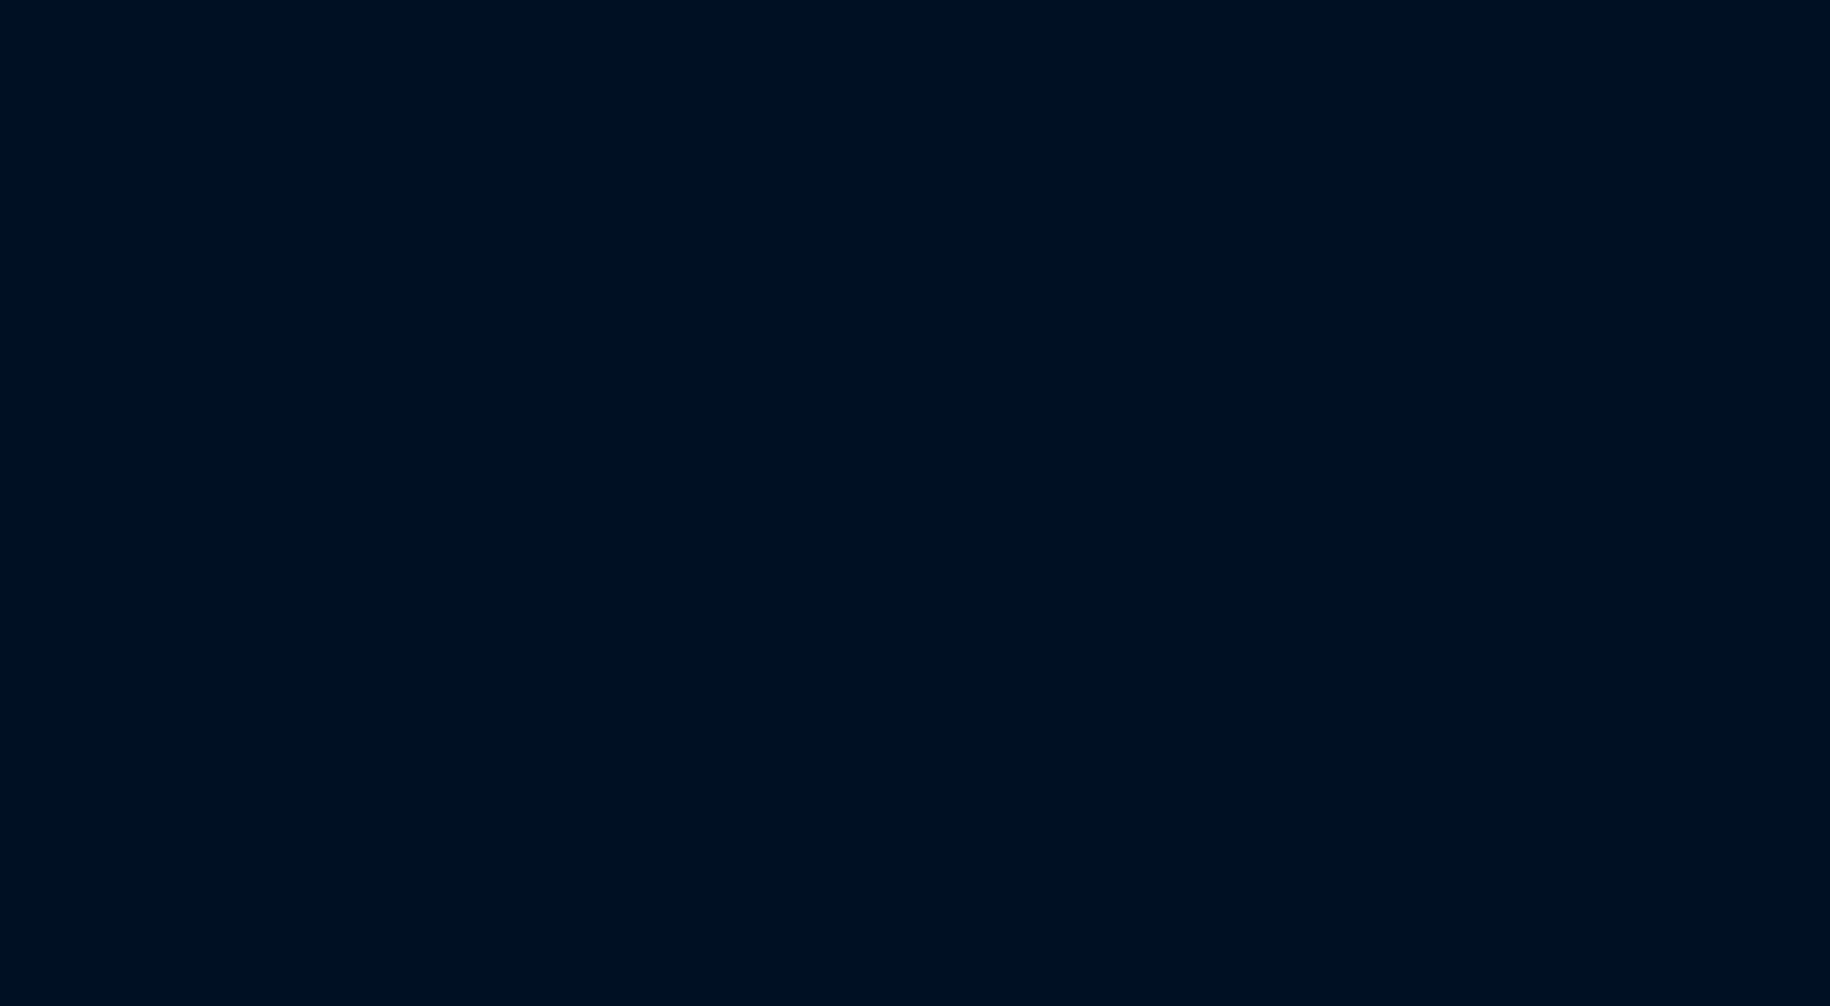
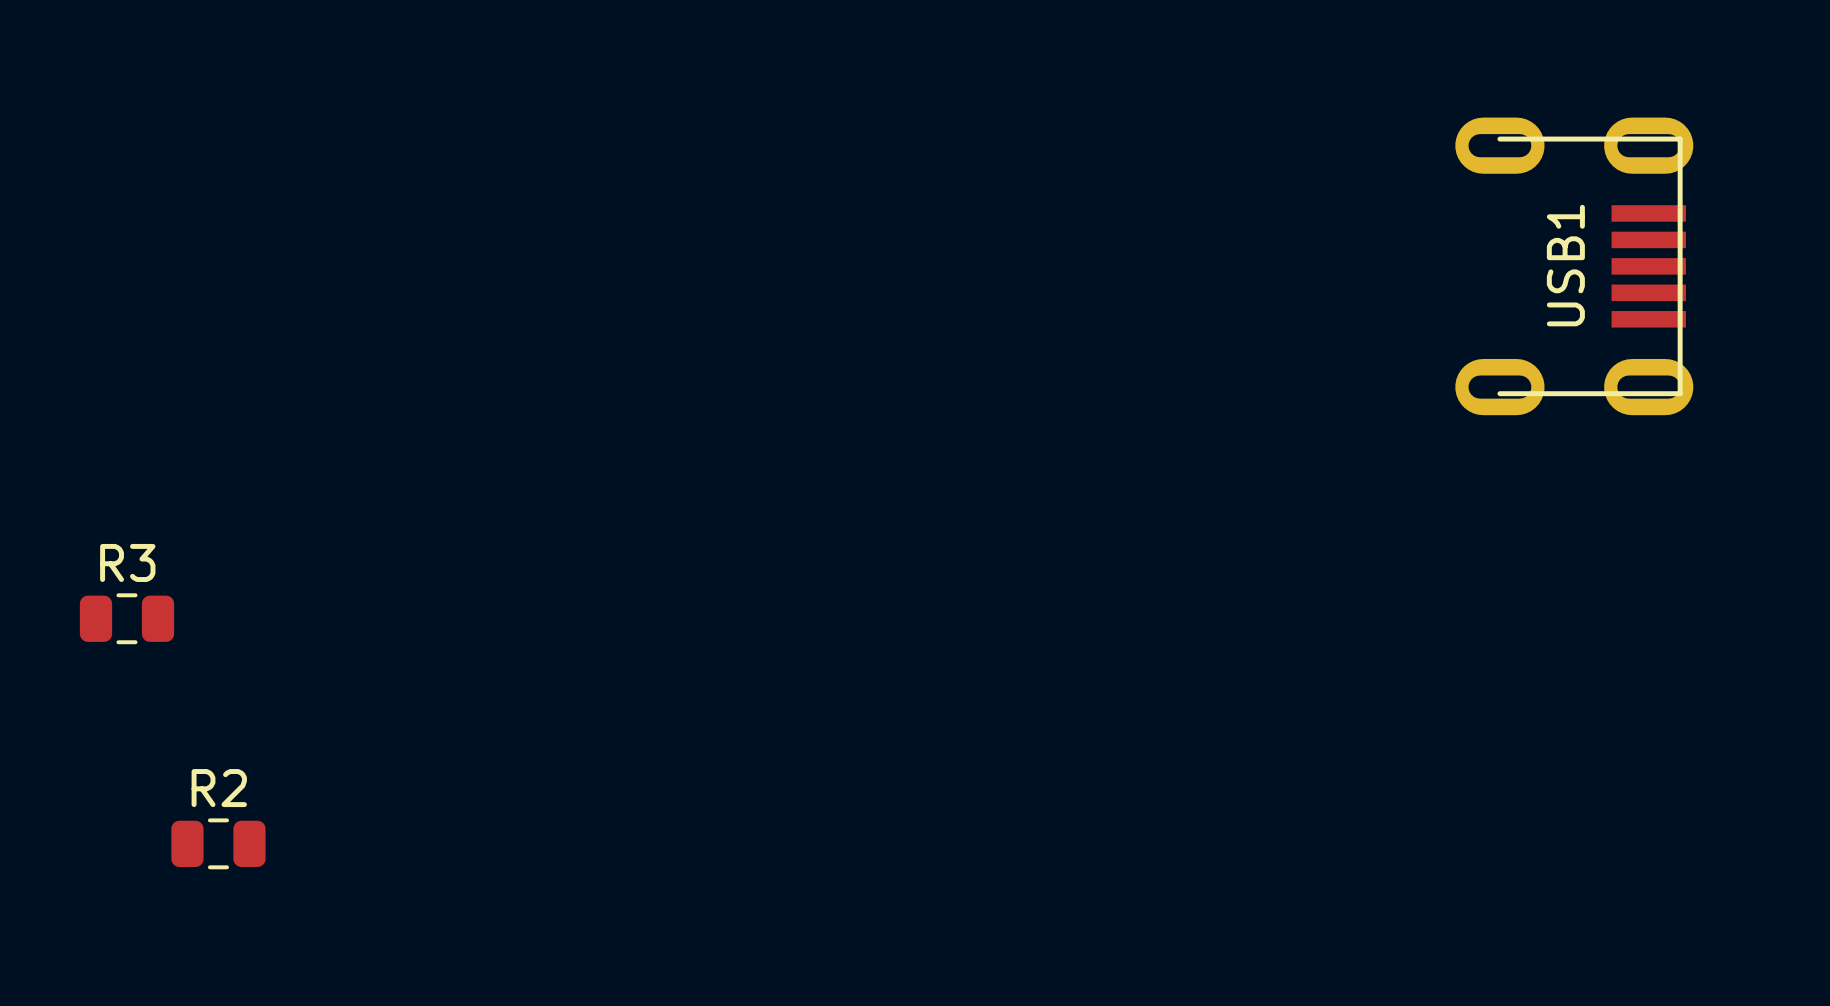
USB1: none -> (1574, 266)
R3: none -> (126, 618)
R2: none -> (218, 843)

